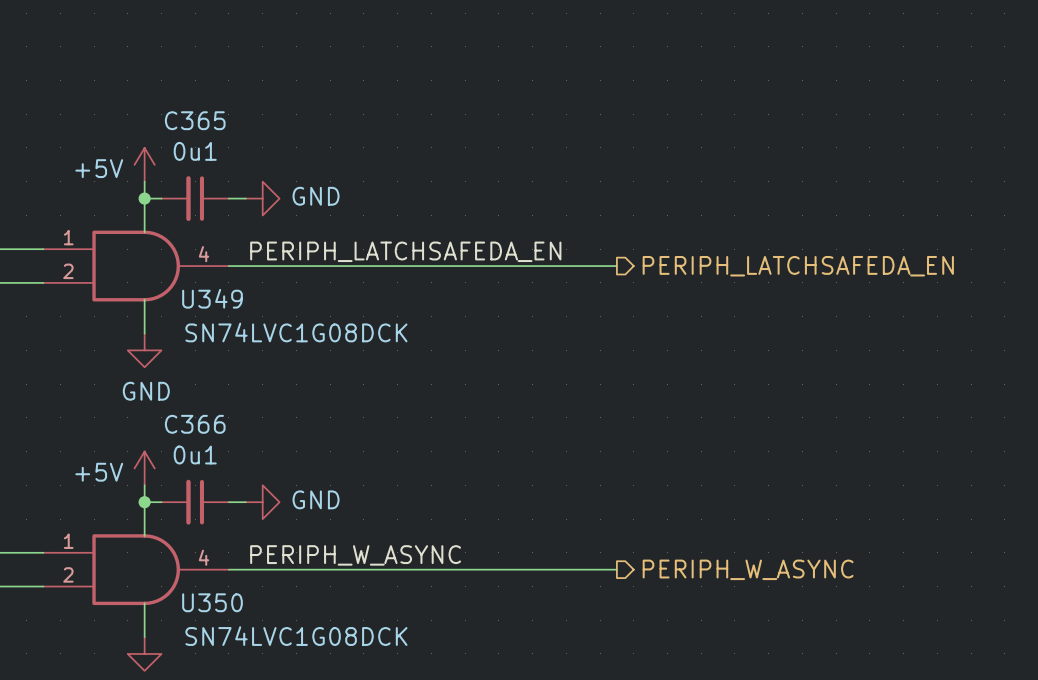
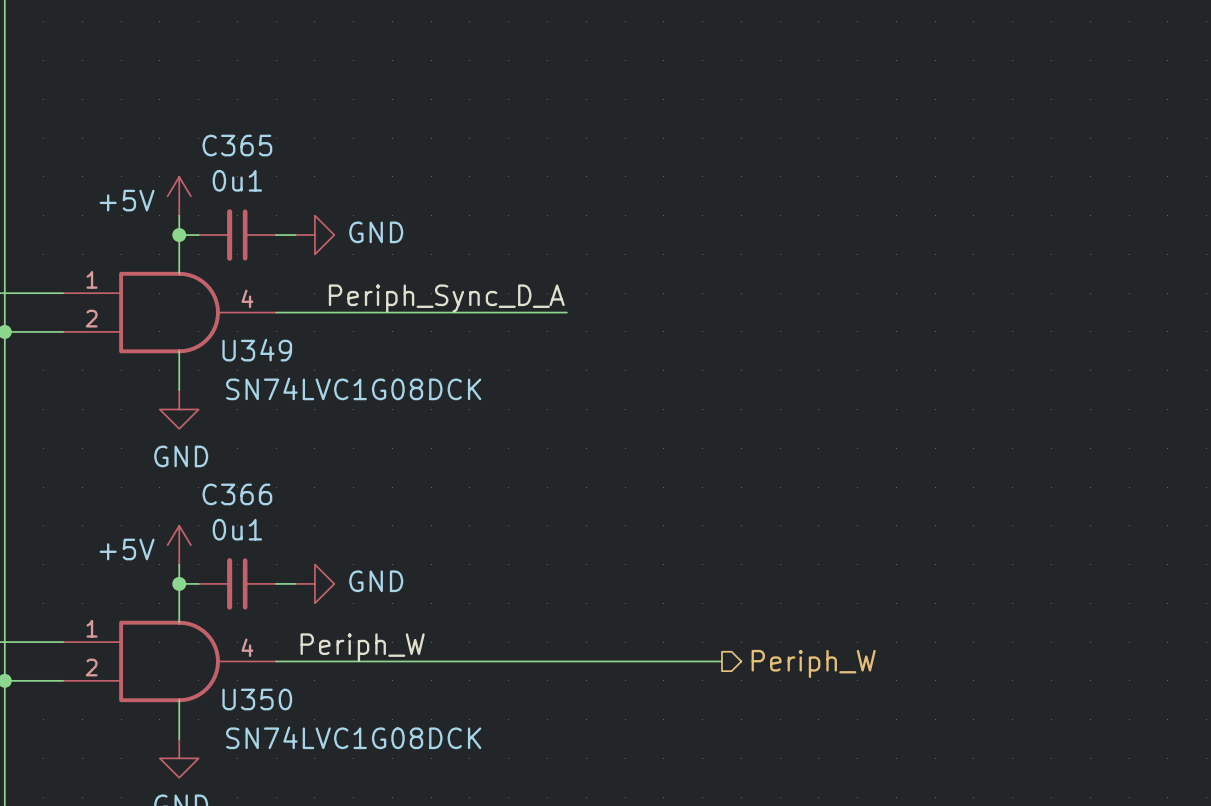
label: PERIPH_LATCHSAFEDA_EN (405, 251) -> none
label: none -> Periph_Sync_D_A (446, 298)
wire: (481, 266) (616, 266) -> none
hierarchical label: PERIPH_LATCHSAFEDA_EN (798, 266) -> none
label: PERIPH_W_ASYNC (355, 555) -> Periph_W (362, 647)
hierarchical label: PERIPH_W_ASYNC (748, 569) -> Periph_W (813, 663)

